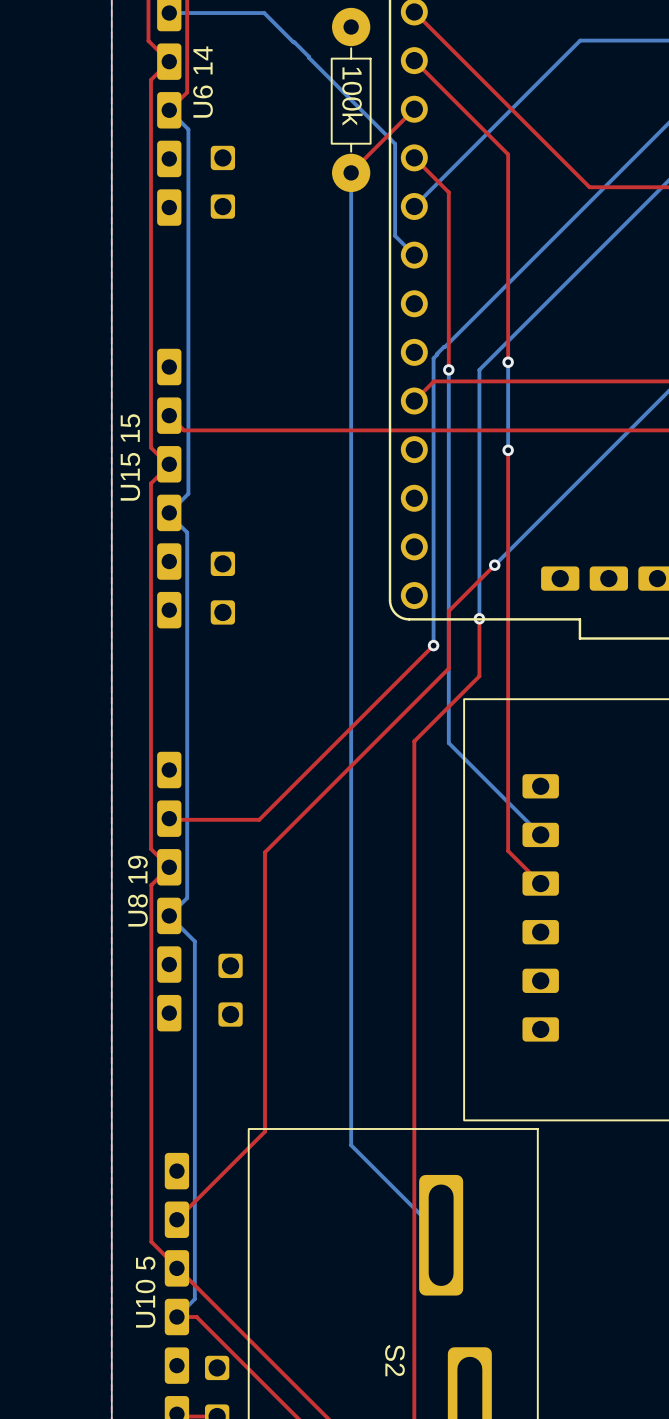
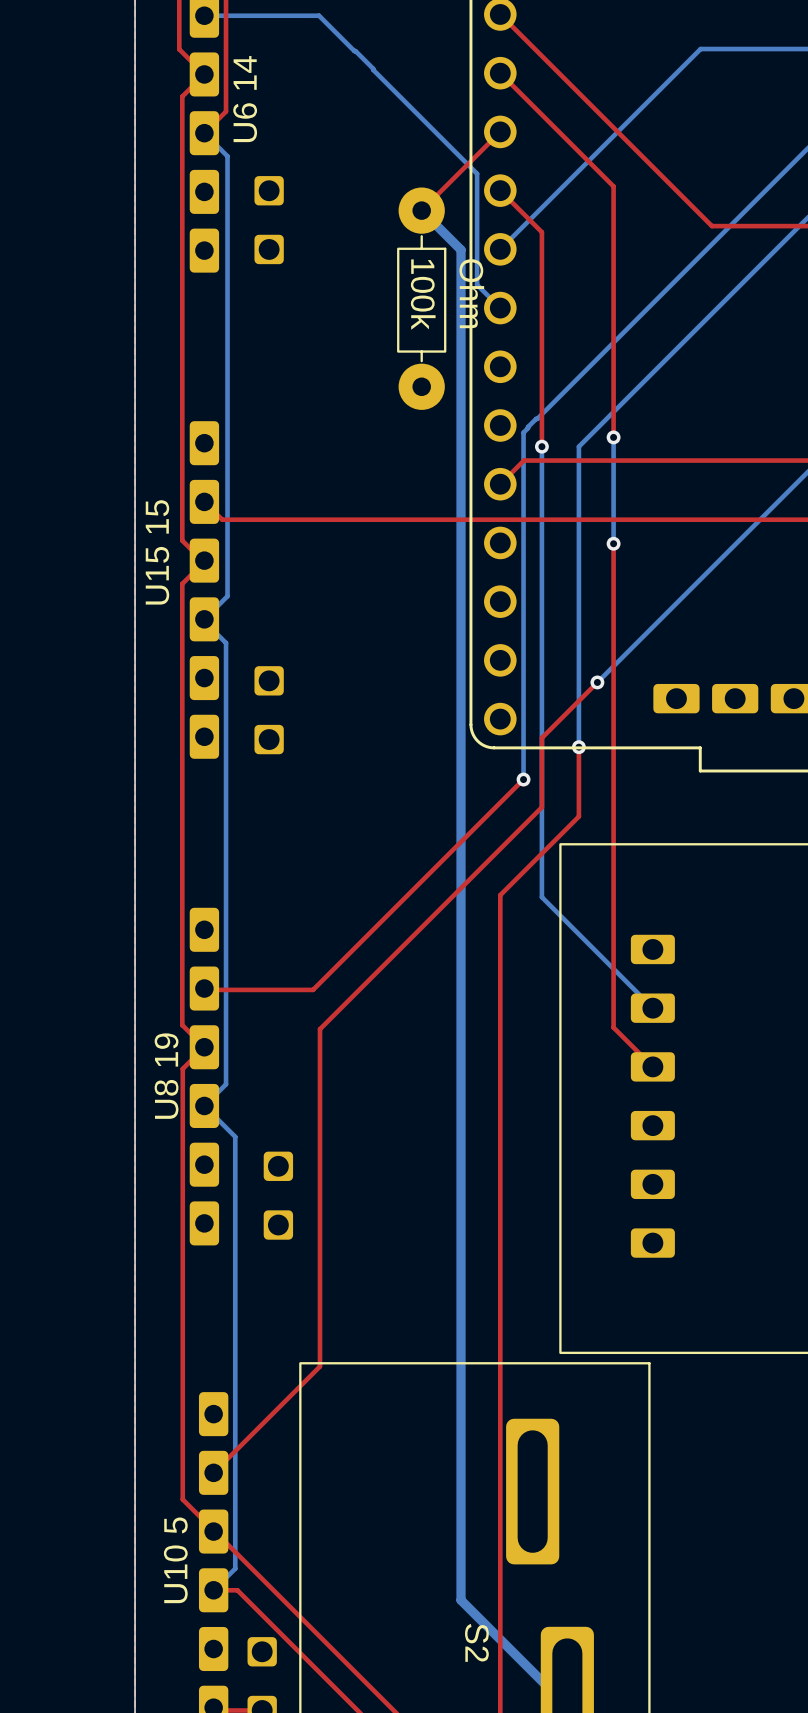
part: (351, 99) -> none
bottom track: none -> (421, 210) (461, 249) (461, 1600) (560, 1699)
bottom track: (351, 176) (351, 172) (351, 1145) (441, 1235) -> none
part: none -> (421, 298)

